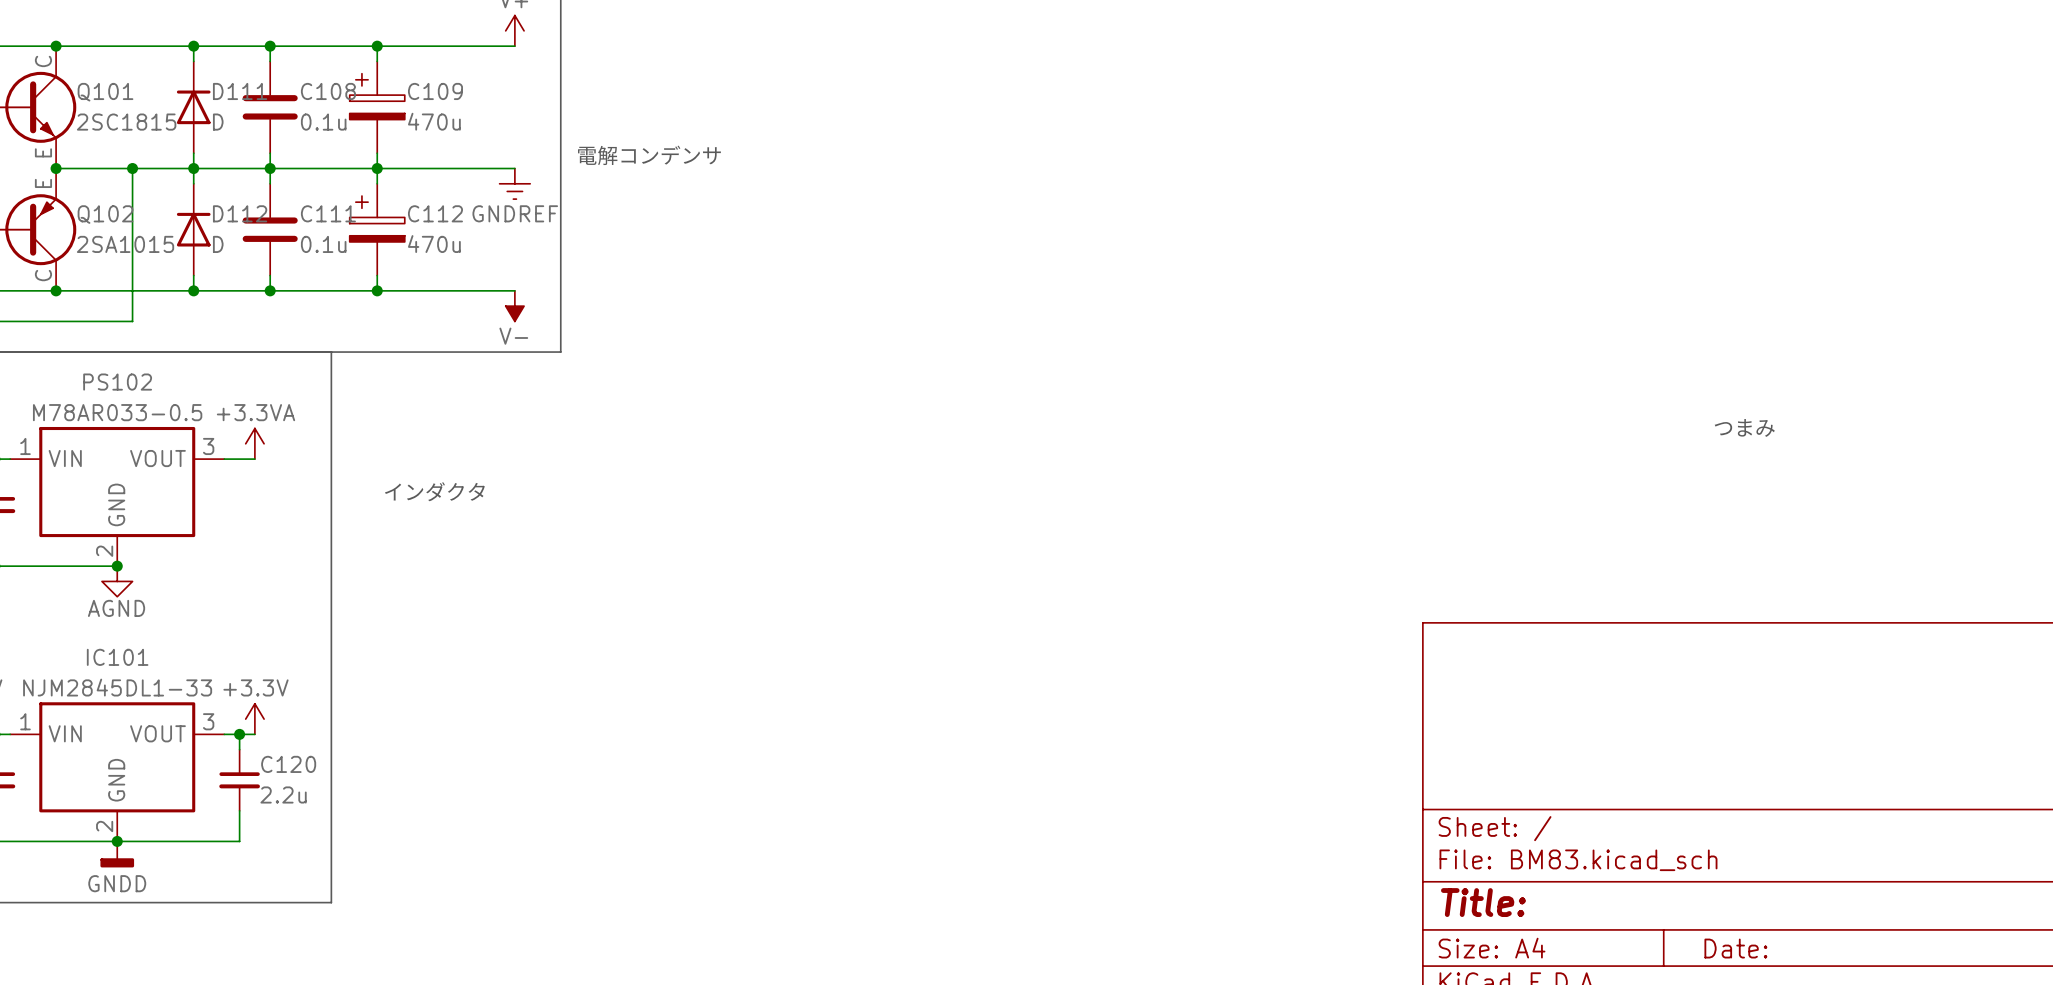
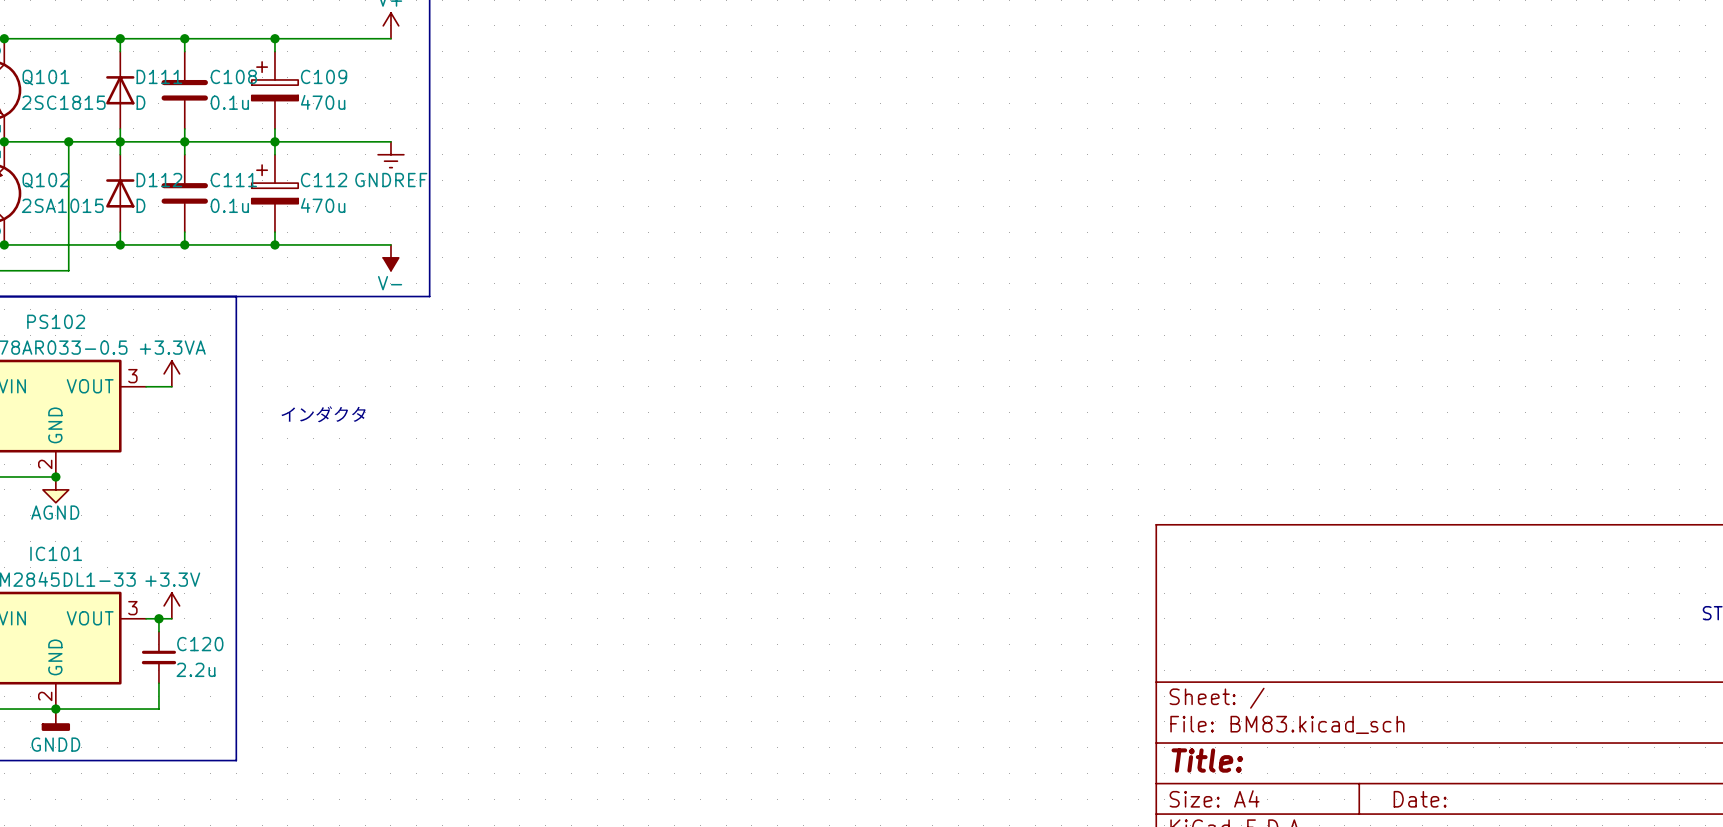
text: 電解コンデンサ (649, 155) -> none
text: つまみ (1744, 427) -> none

